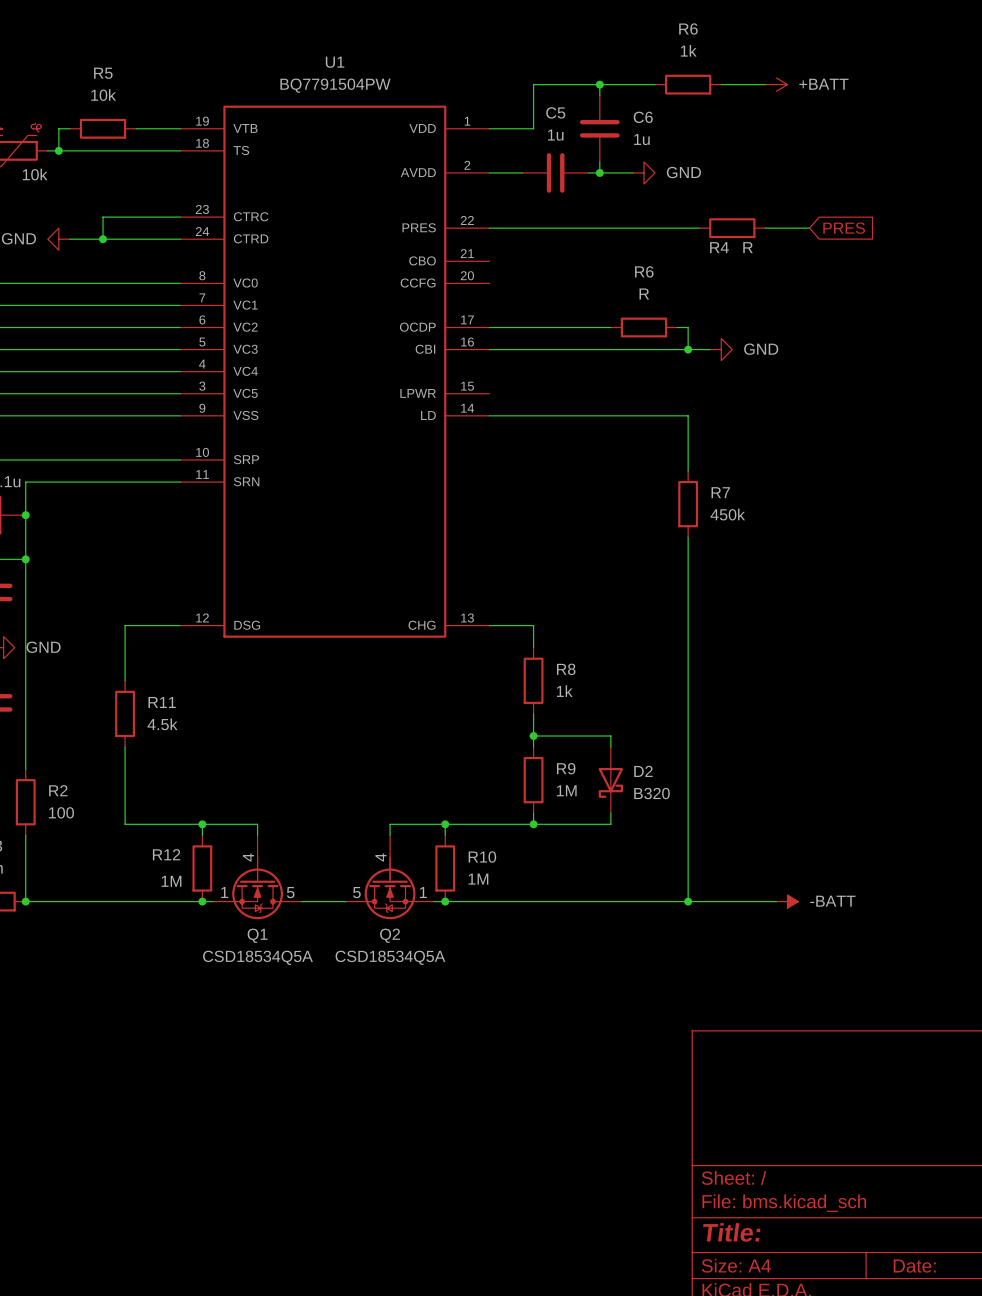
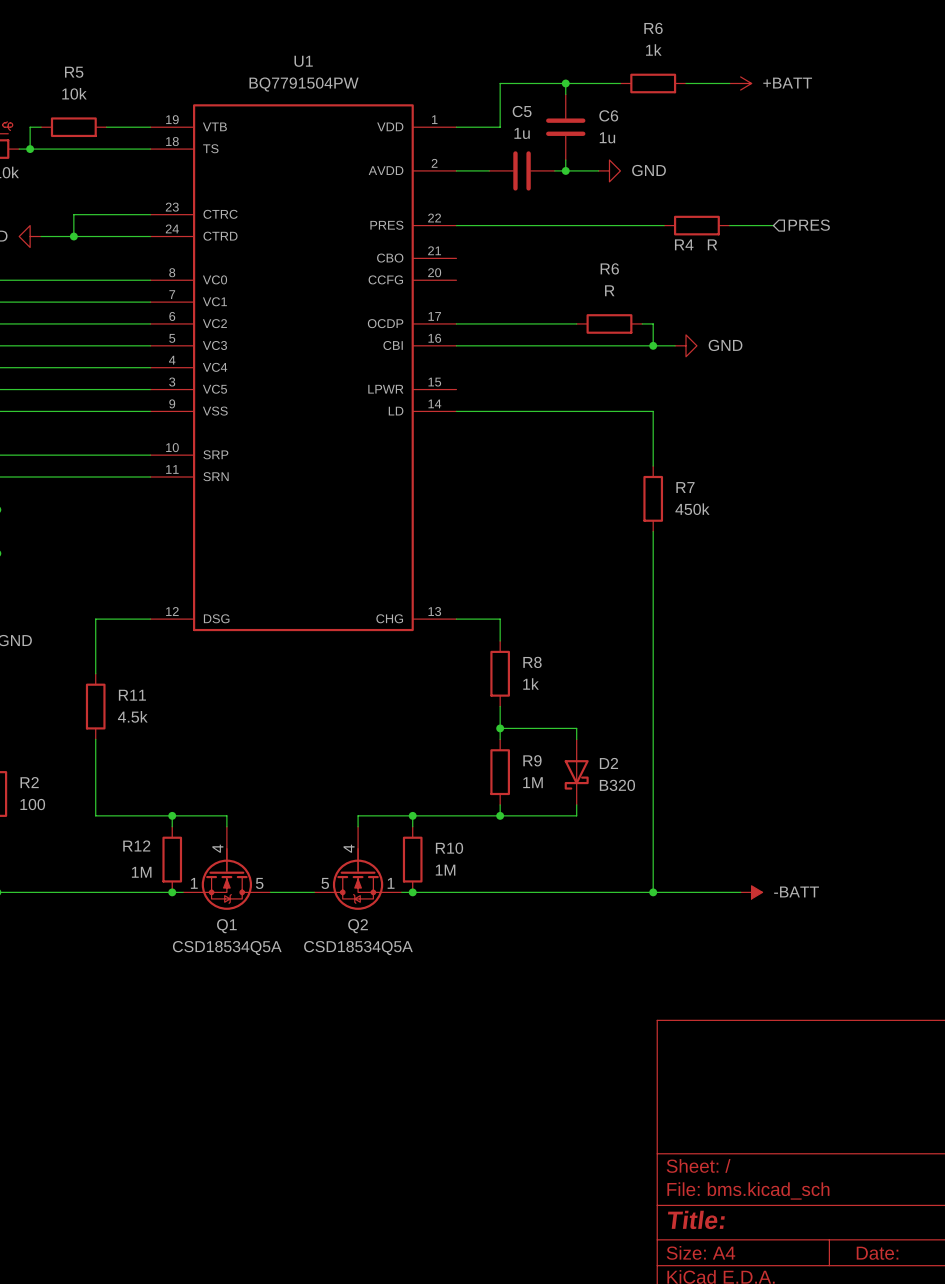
hierarchical label: none -> PRES (809, 225)
global label: PRES (844, 228) -> none

